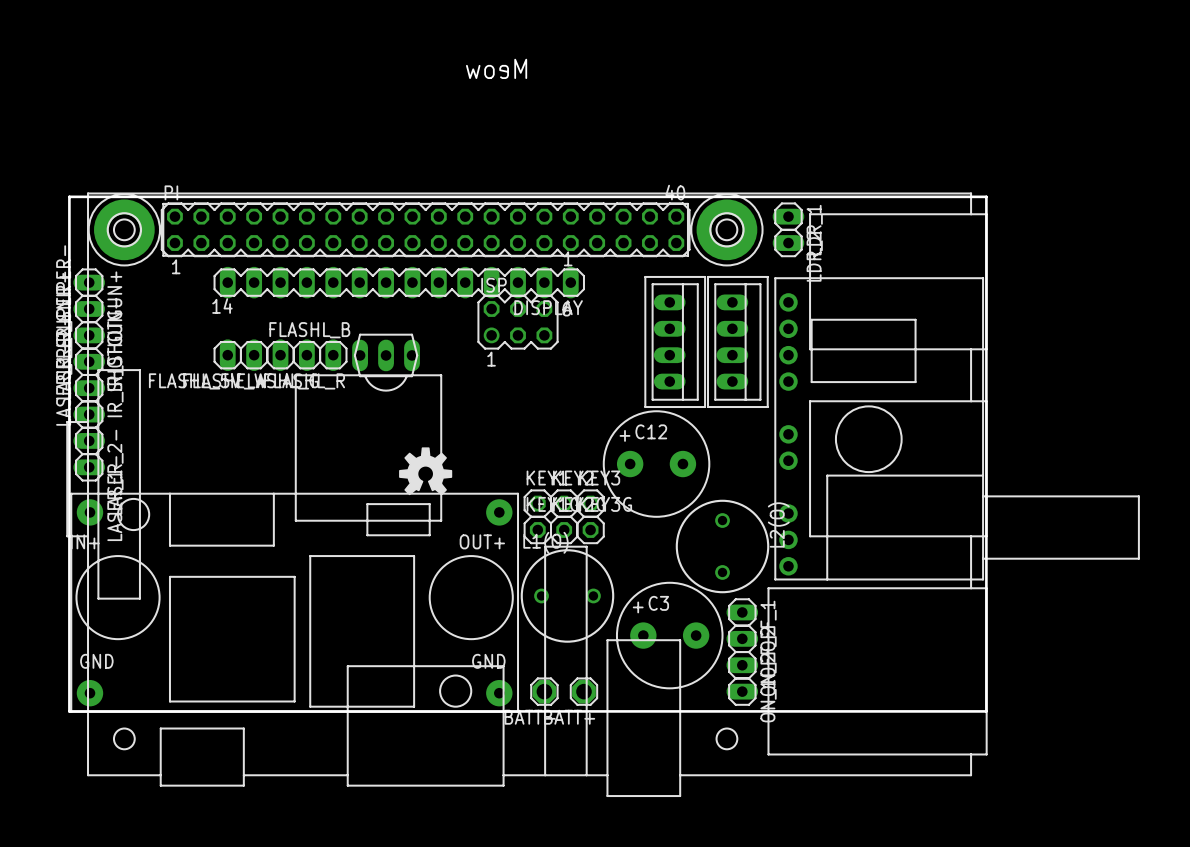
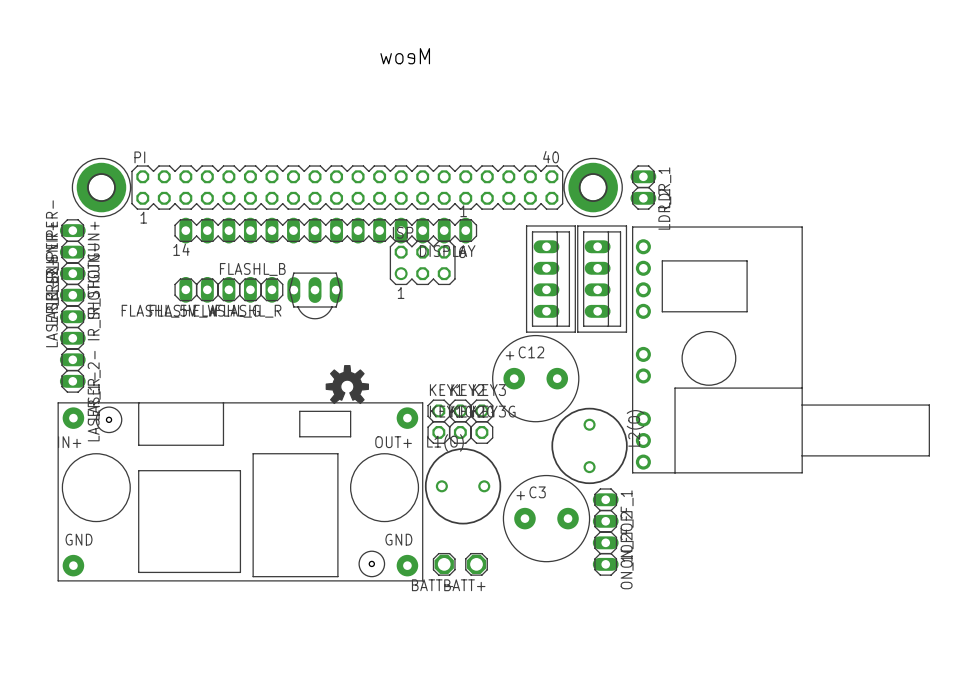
drawing: [66, 192, 988, 797] -> none
board edge: (69, 196) (69, 711) (986, 711) (986, 196) (69, 196) -> none
part footprint: [70, 493, 519, 713] -> [57, 402, 424, 582]

